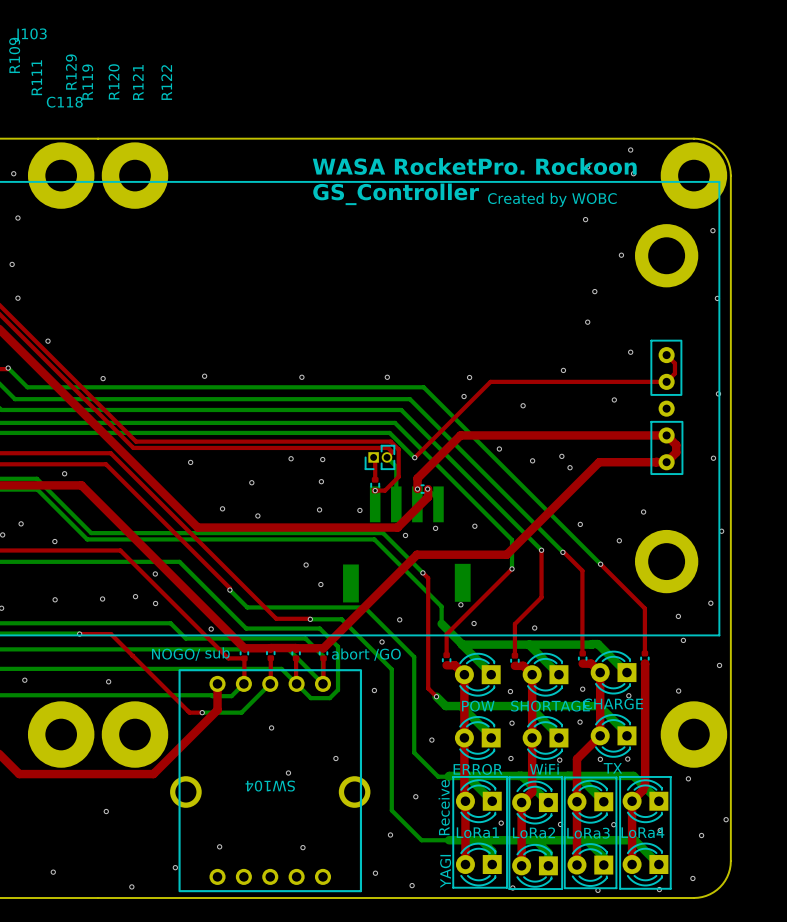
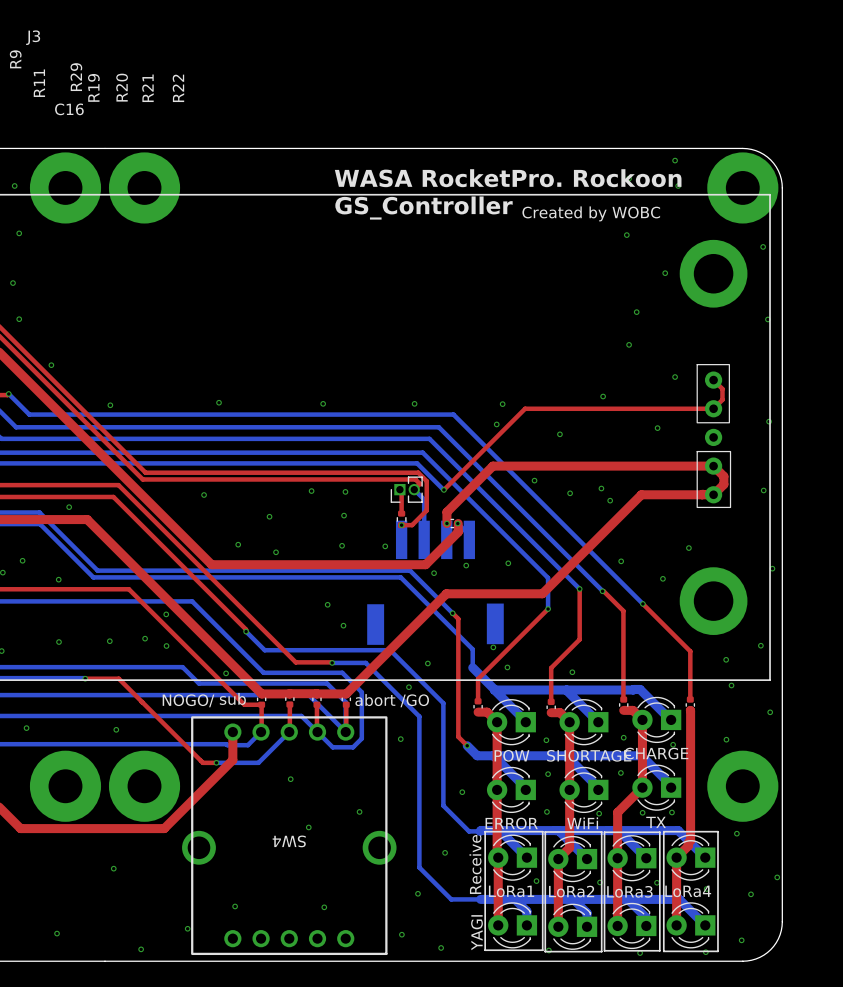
J103 name: J103 (30, 35) -> J3 (33, 37)
R109 name: R109 (14, 55) -> R9 (15, 59)
R129 name: R129 (71, 72) -> R29 (76, 77)
R111 name: R111 (36, 77) -> R11 (39, 83)
R120 name: R120 (114, 81) -> R20 (122, 87)
R119 name: R119 (87, 82) -> R19 (93, 87)
R121 name: R121 (138, 82) -> R21 (147, 88)
R122 name: R122 (166, 82) -> R22 (178, 88)
C118 name: C118 (64, 102) -> C16 (69, 109)
SW104 name: SW104 (270, 786) -> SW4 (289, 841)

